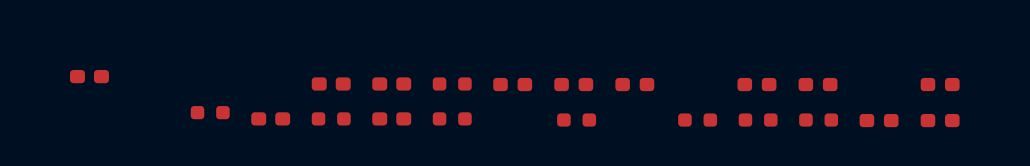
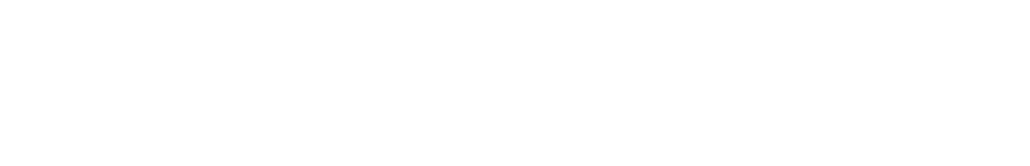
part: (89, 76) -> none
part: (331, 83) -> none
part: (391, 83) -> none
part: (452, 83) -> none
part: (512, 84) -> none
part: (573, 84) -> none
part: (634, 84) -> none
part: (756, 84) -> none
part: (818, 84) -> none
part: (940, 84) -> none
part: (210, 112) -> none
part: (270, 118) -> none
part: (331, 118) -> none
part: (391, 118) -> none
part: (452, 118) -> none
part: (576, 120) -> none
part: (697, 120) -> none
part: (758, 120) -> none
part: (818, 120) -> none
part: (879, 120) -> none
part: (940, 120) -> none

